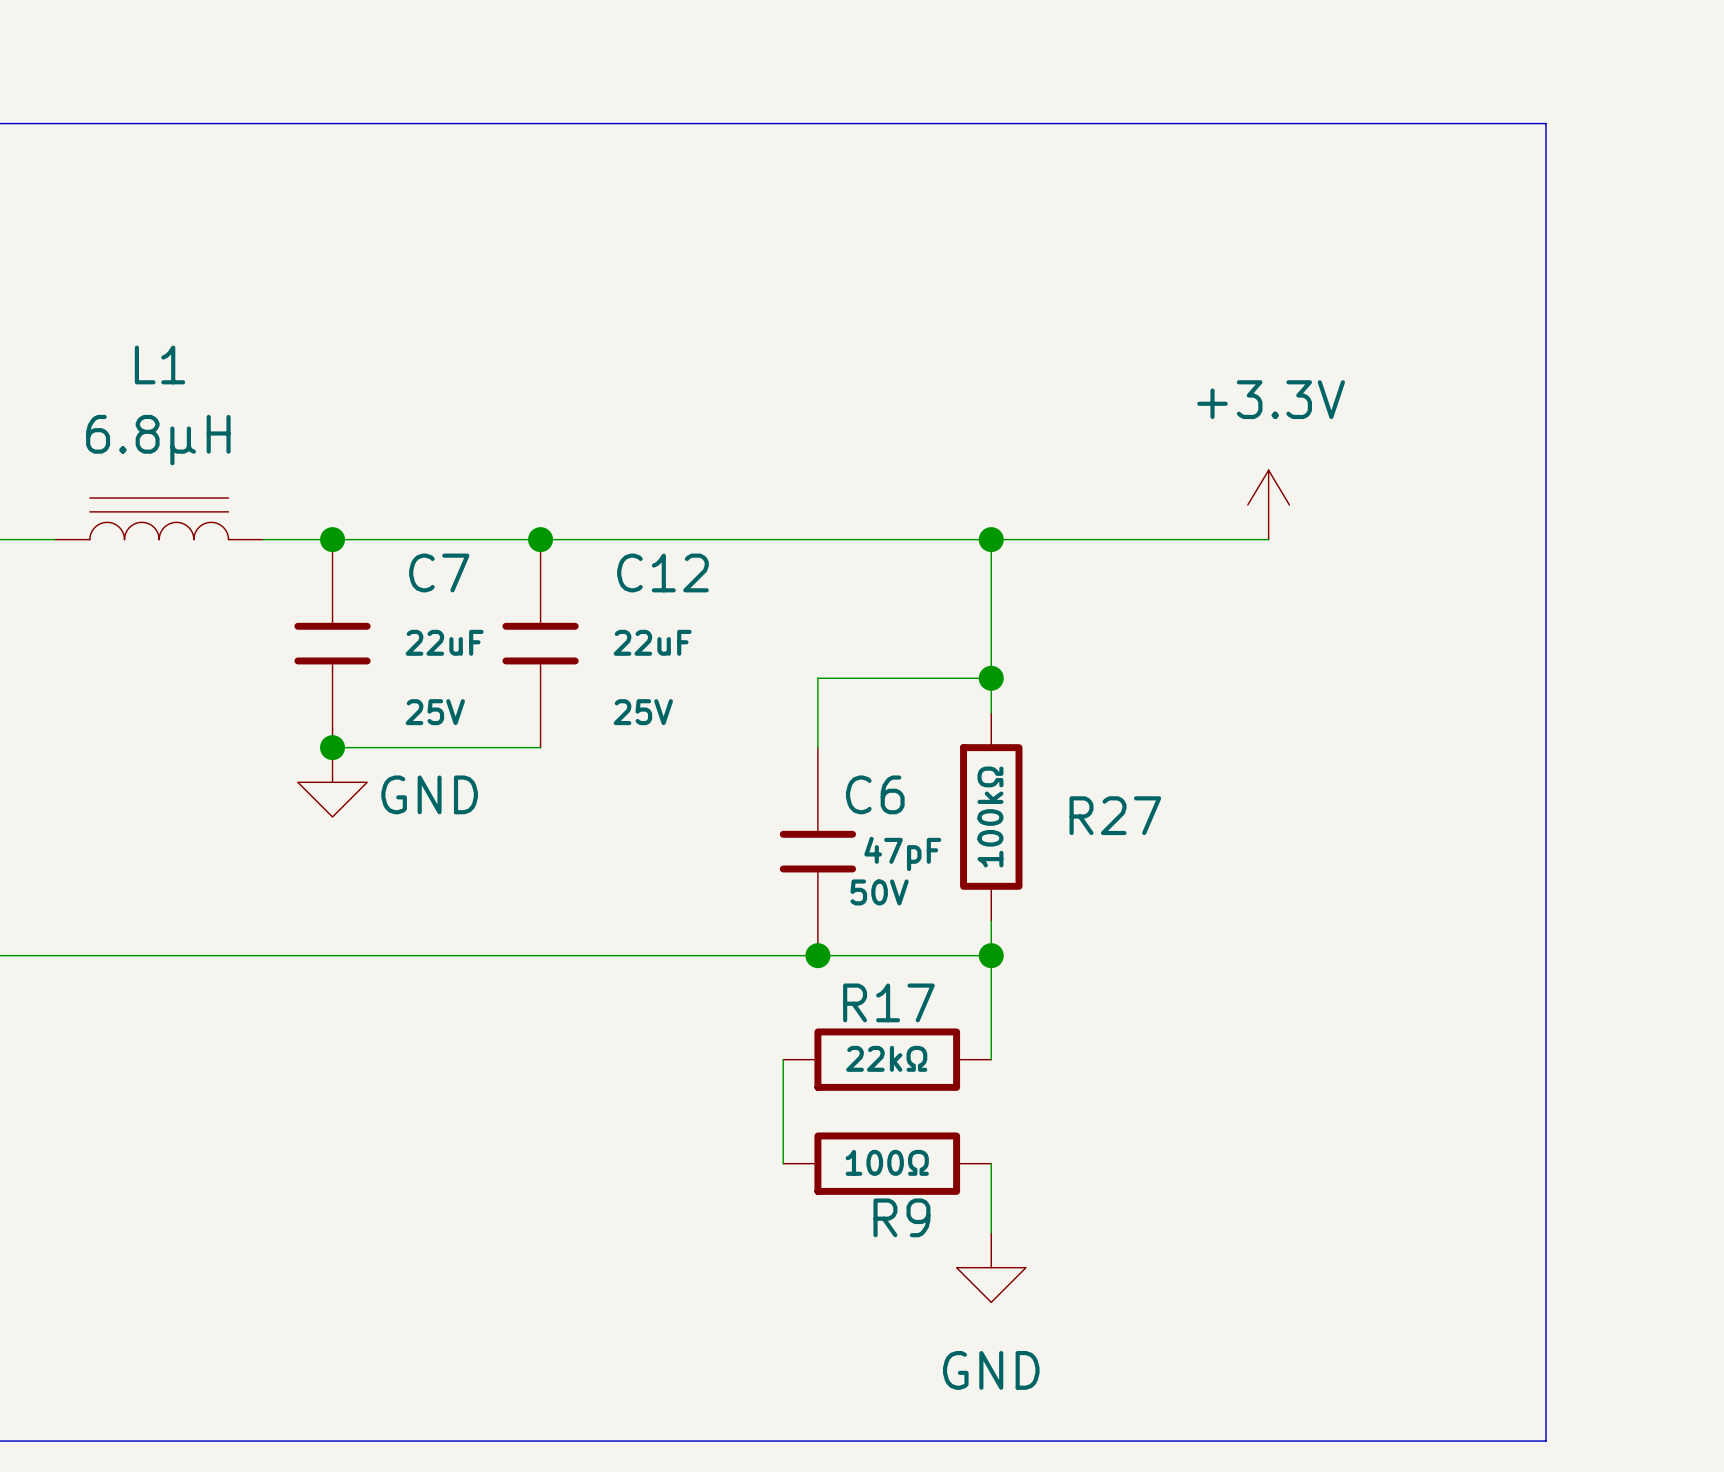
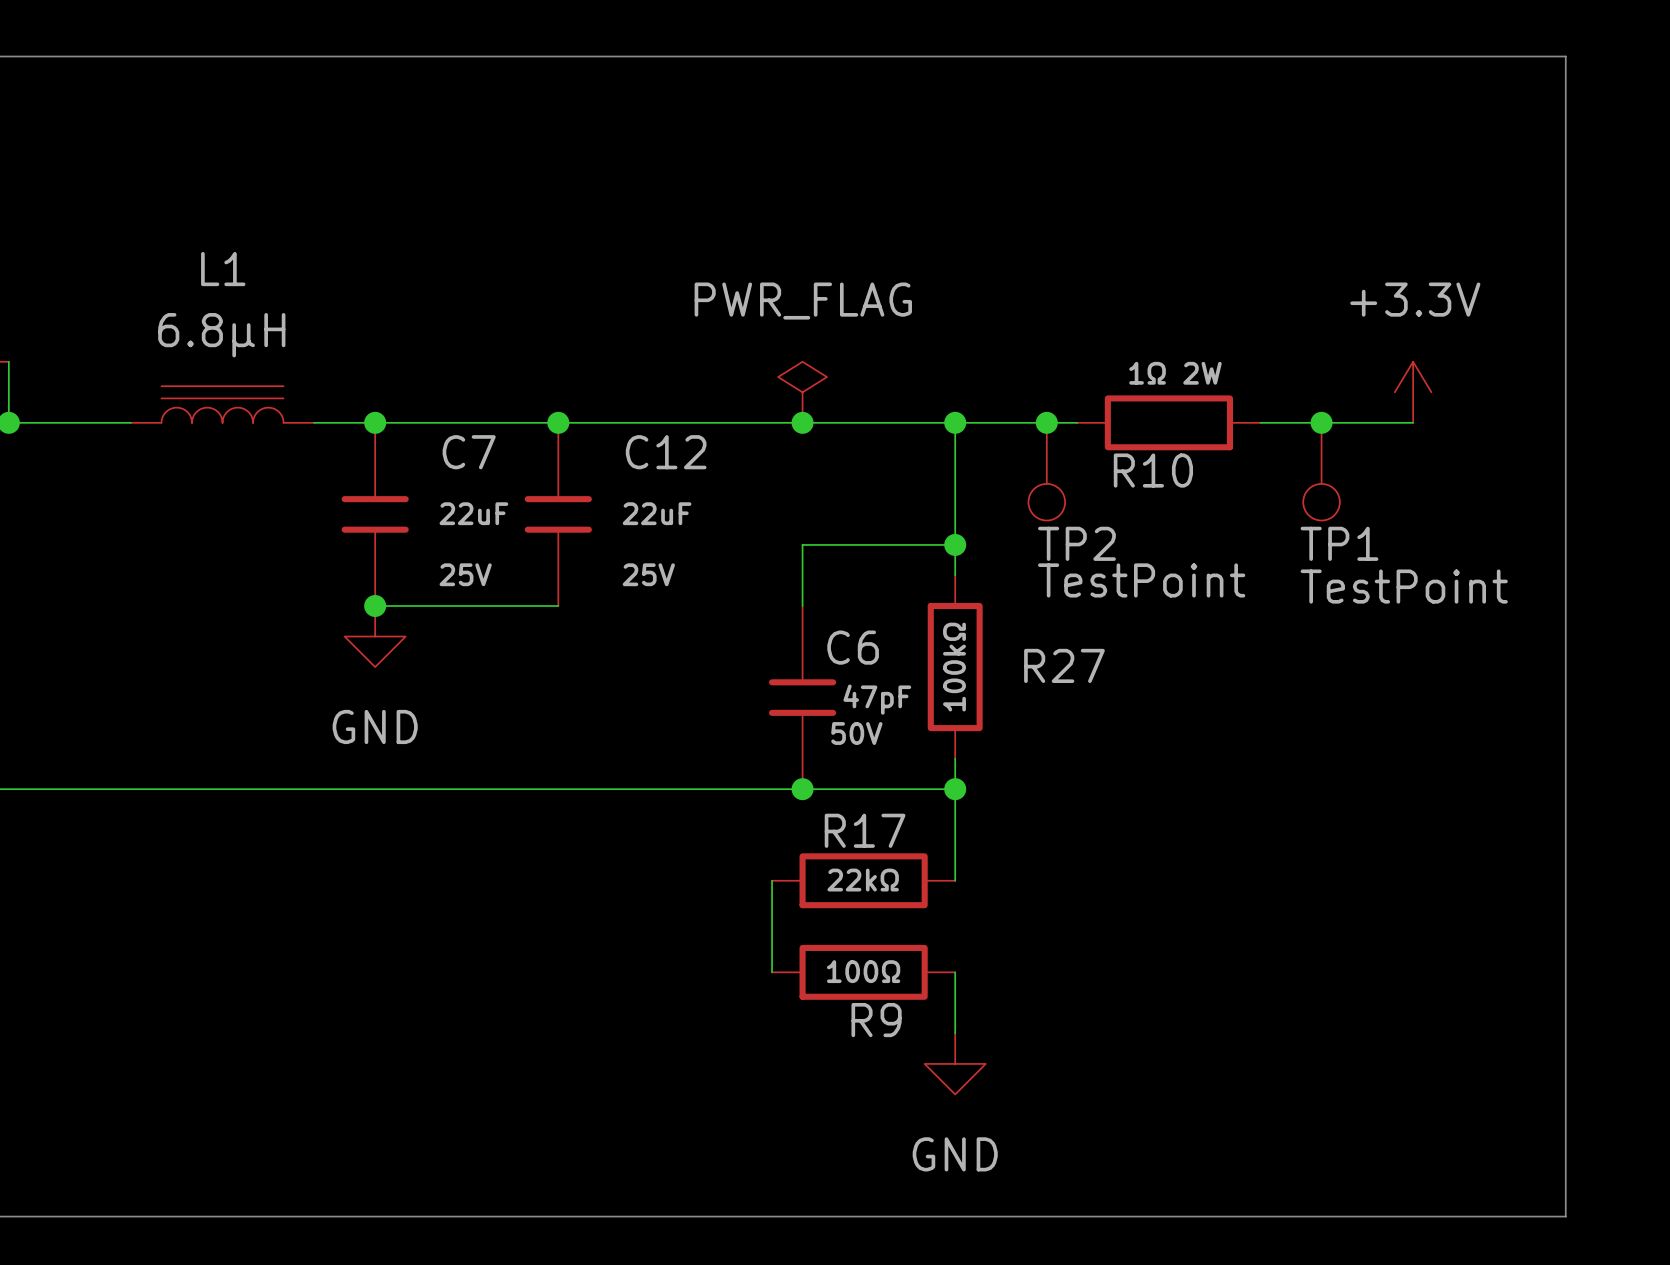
line: (1545, 123) (1545, 1441) -> (1443, 56) (1565, 56) (1565, 1216) (1443, 1216)
power symbol: none -> PWR_FLAG (802, 392)
power symbol position: +3.3V (1268, 504) -> +3.3V (1413, 392)
junction: none -> (802, 422)
junction: none -> (1046, 422)
wire: (1129, 539) (1268, 539) -> none
R10: none -> 1Ω 2W (1168, 422)
wire: none -> (1260, 422) (1413, 422)
junction: none -> (1321, 422)
TP2: none -> TestPoint (1046, 471)
TP1: none -> TestPoint (1321, 471)
power symbol text position: GND (429, 794) -> GND (375, 726)

